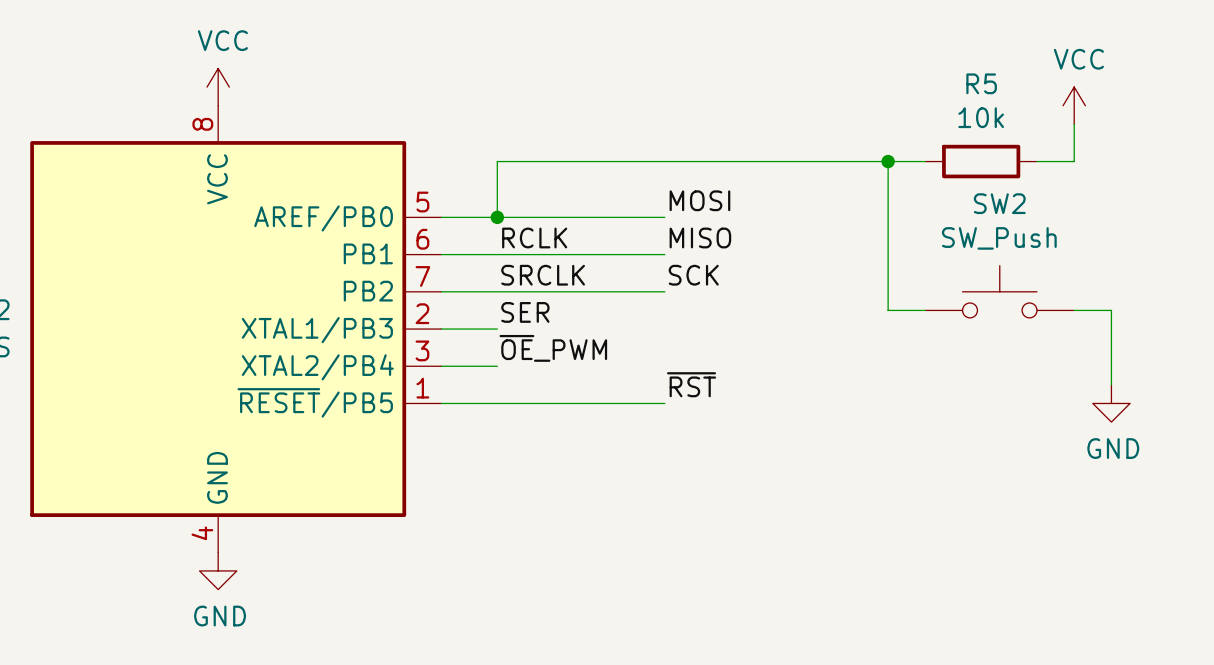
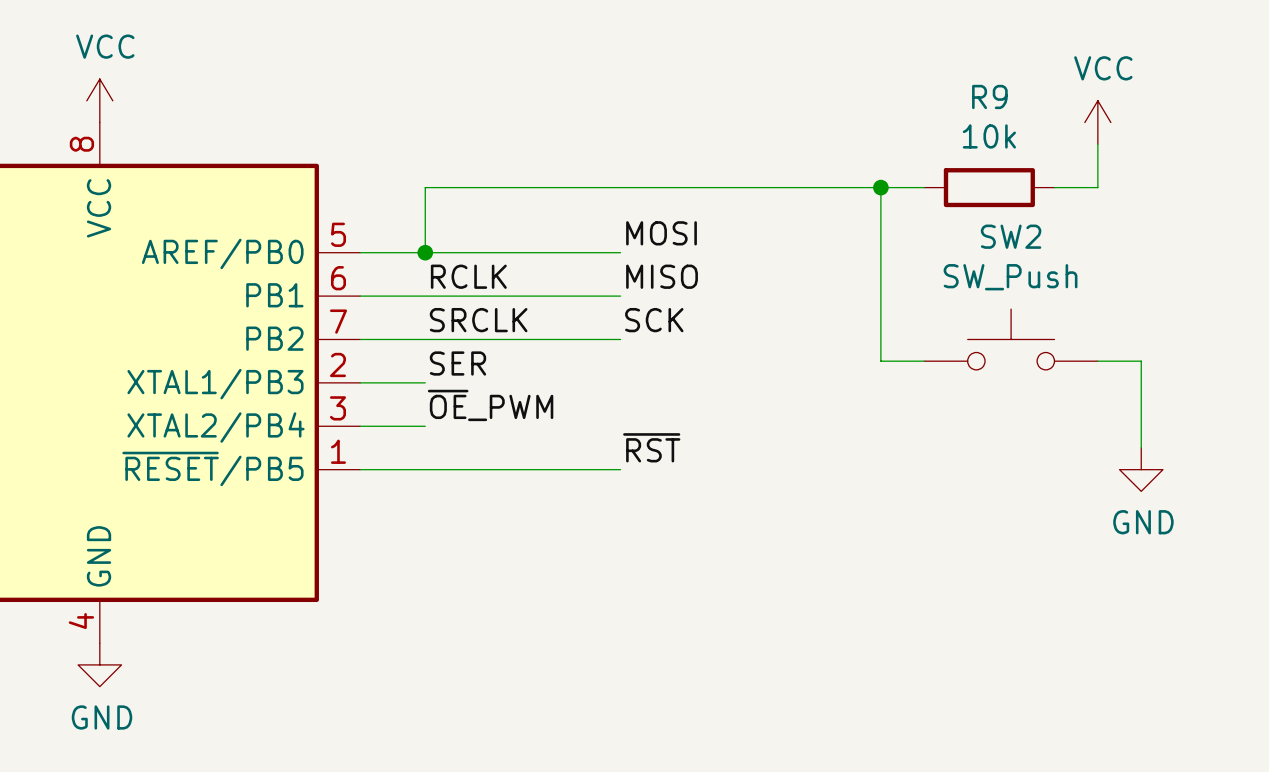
R5 name: R5 (981, 83) -> R9 (989, 96)

